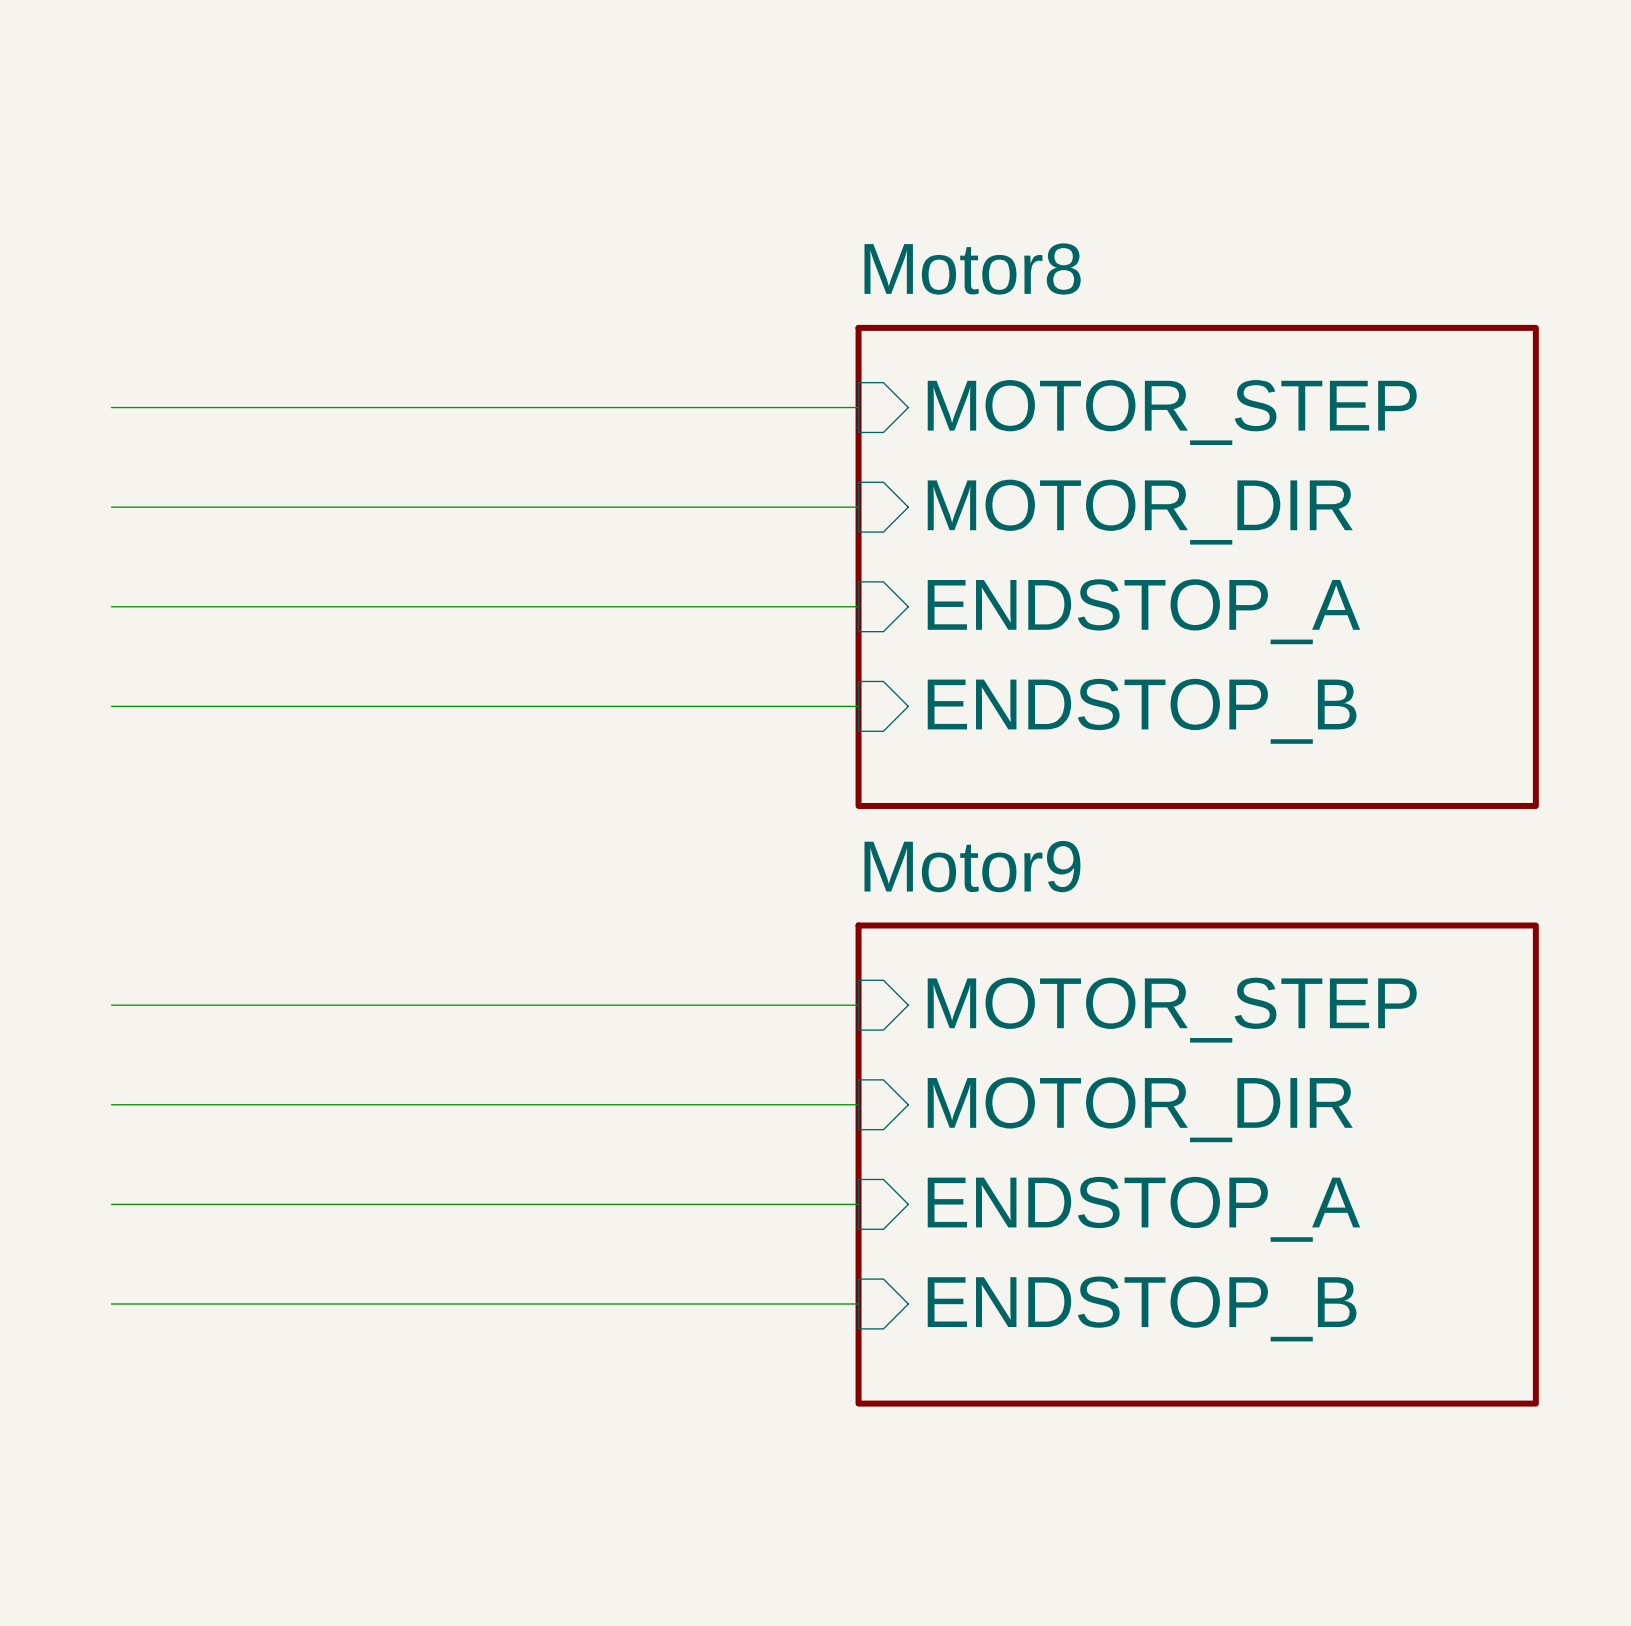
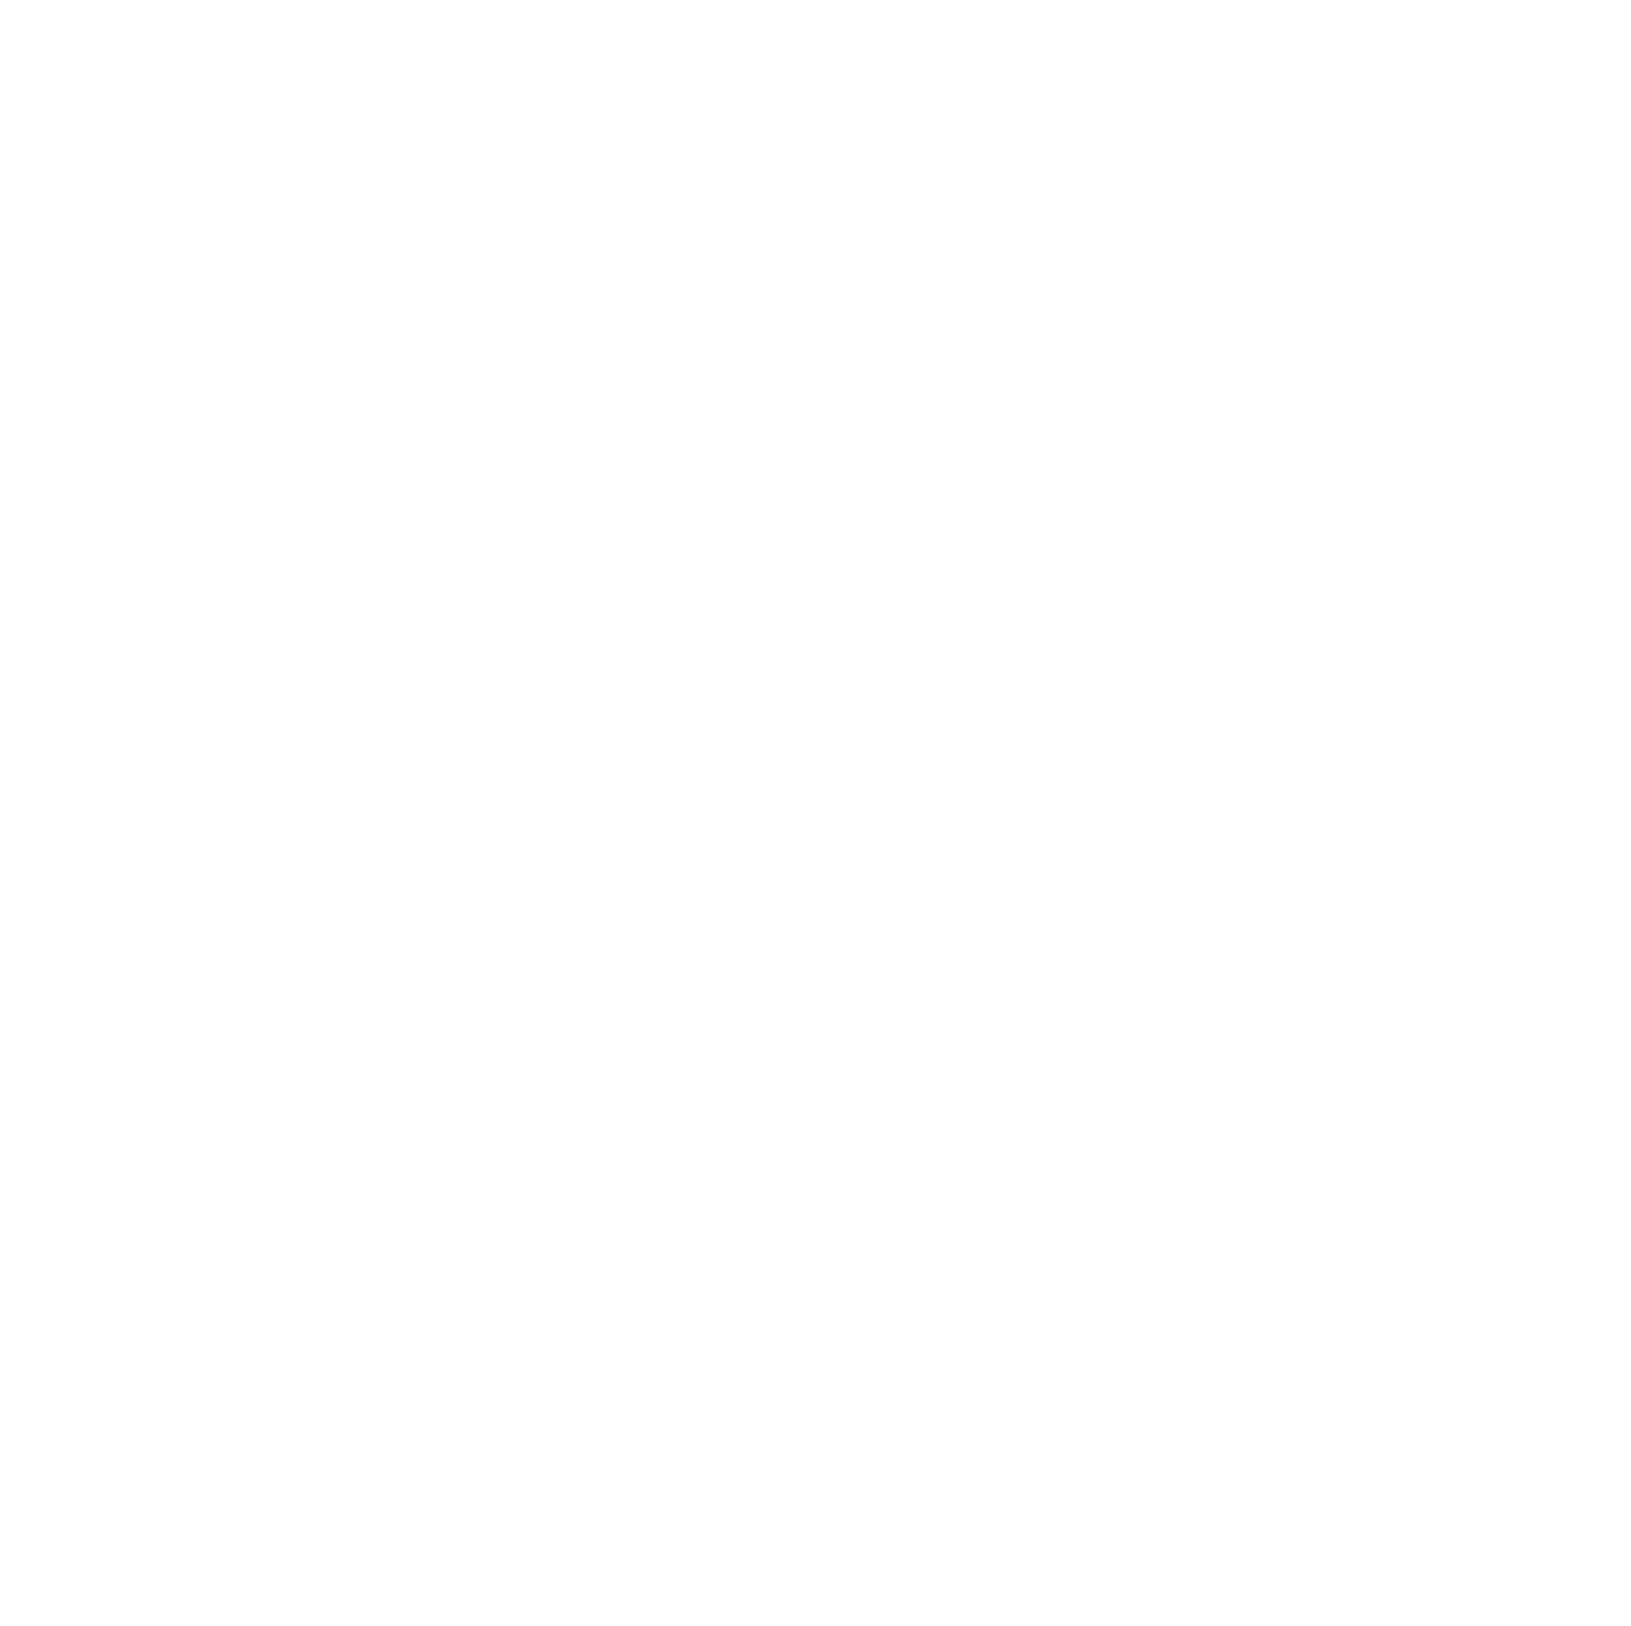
wire: (111, 407) (858, 407) -> none
sheet pin: MOTOR_STEP (1172, 412) -> none
wire: (111, 507) (858, 507) -> none
sheet pin: MOTOR_DIR (1140, 512) -> none
sheet Motor8: (1197, 566) -> none
wire: (111, 606) (858, 606) -> none
sheet pin: ENDSTOP_A (1143, 611) -> none
wire: (111, 706) (858, 706) -> none
sheet pin: ENDSTOP_B (1142, 711) -> none
wire: (111, 1005) (858, 1005) -> none
sheet pin: MOTOR_STEP (1172, 1010) -> none
wire: (111, 1104) (858, 1104) -> none
sheet pin: MOTOR_DIR (1140, 1109) -> none
sheet Motor9: (1197, 1164) -> none
wire: (111, 1204) (858, 1204) -> none
sheet pin: ENDSTOP_A (1143, 1209) -> none
wire: (111, 1303) (858, 1303) -> none
sheet pin: ENDSTOP_B (1142, 1308) -> none

